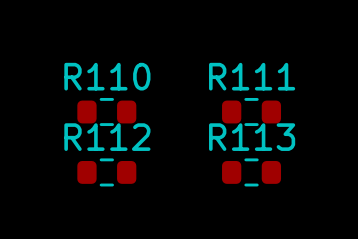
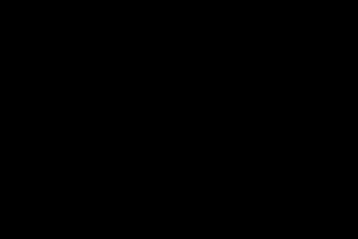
R110: (106, 112) -> none
R111: (251, 112) -> none
R112: (106, 172) -> none
R113: (251, 172) -> none

